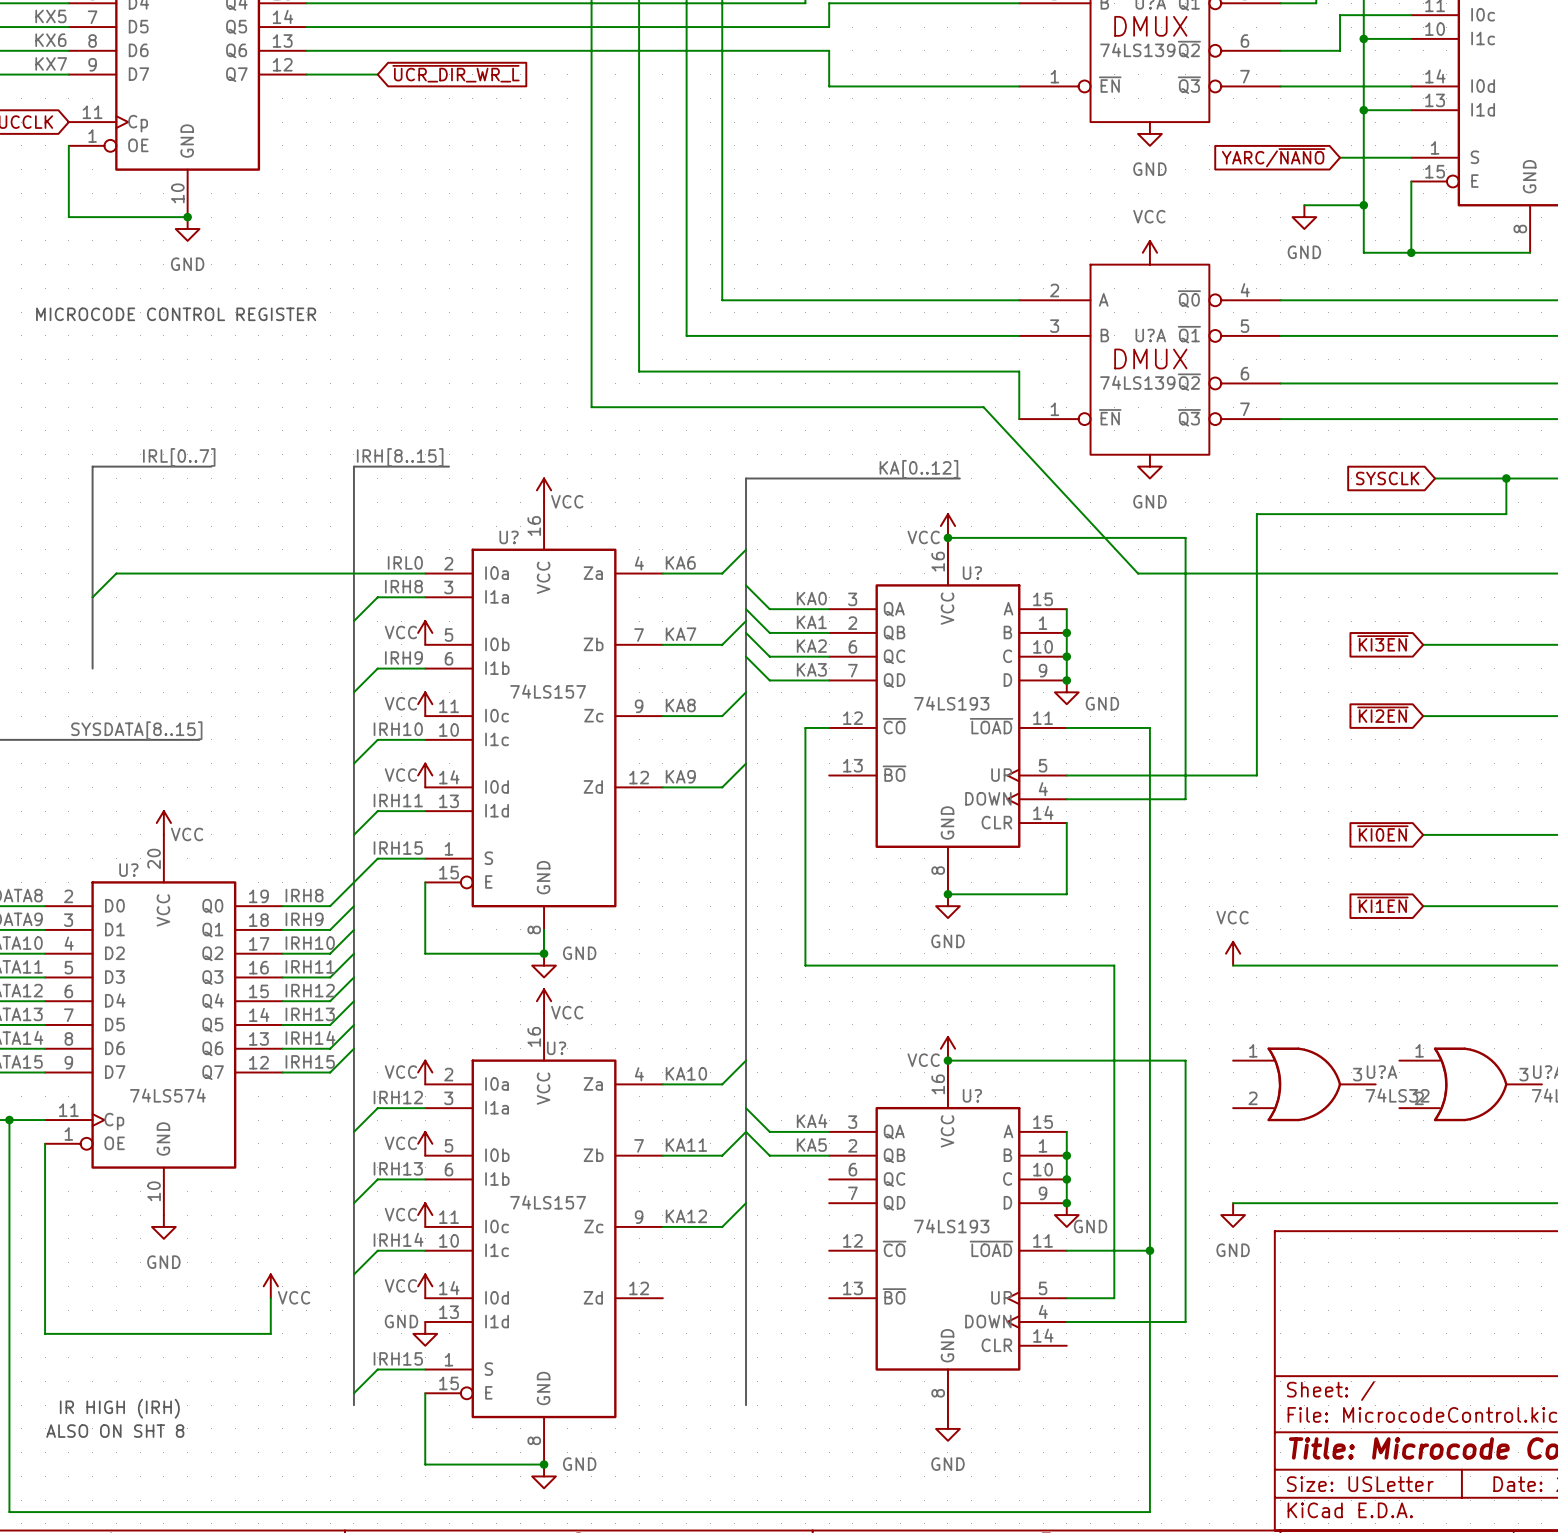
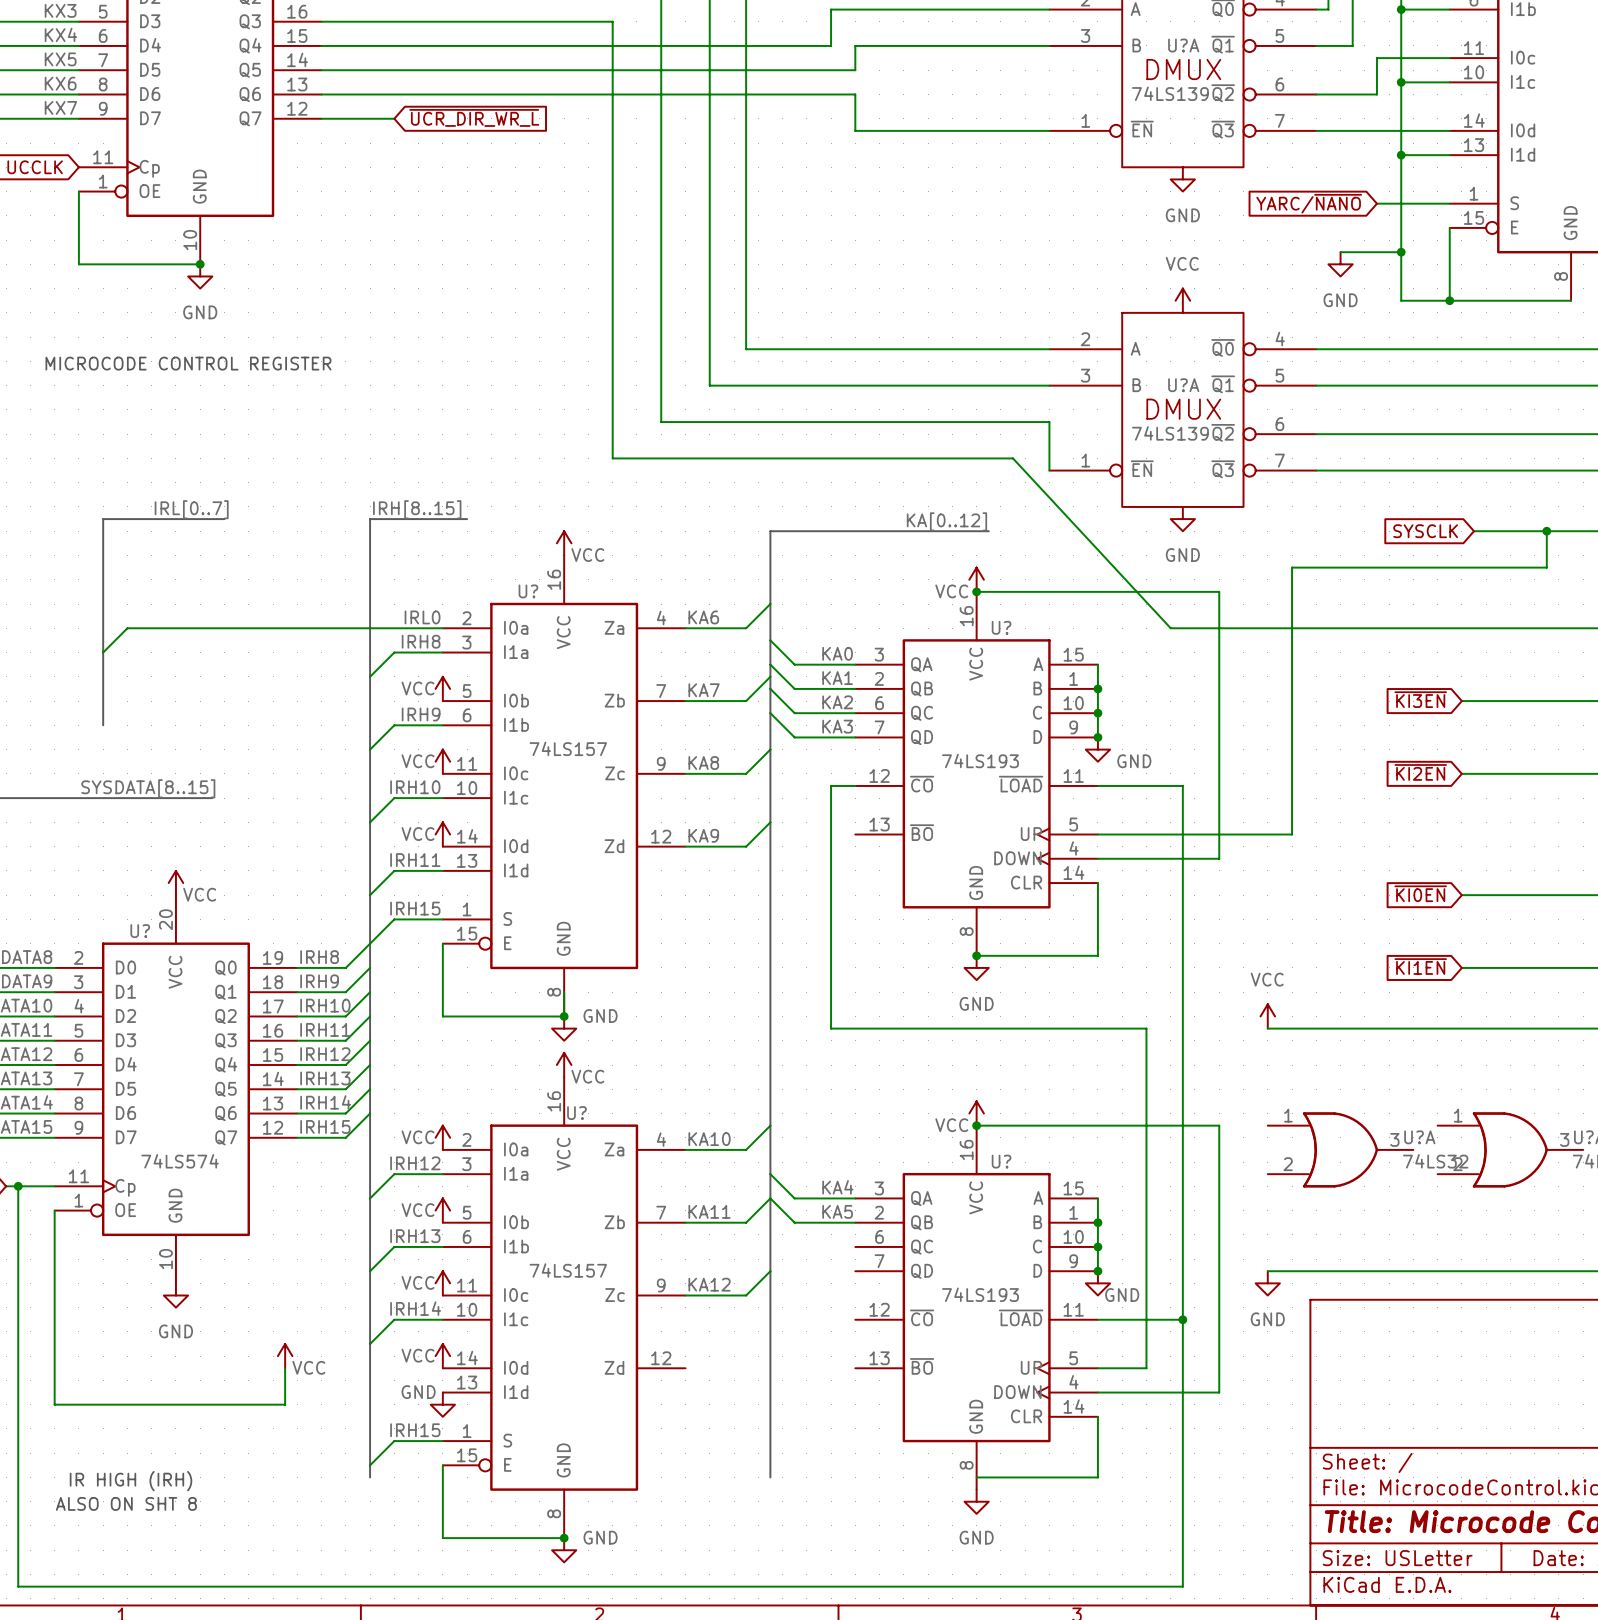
wire: none -> (1097, 1416) (1097, 1477) (976, 1477)

